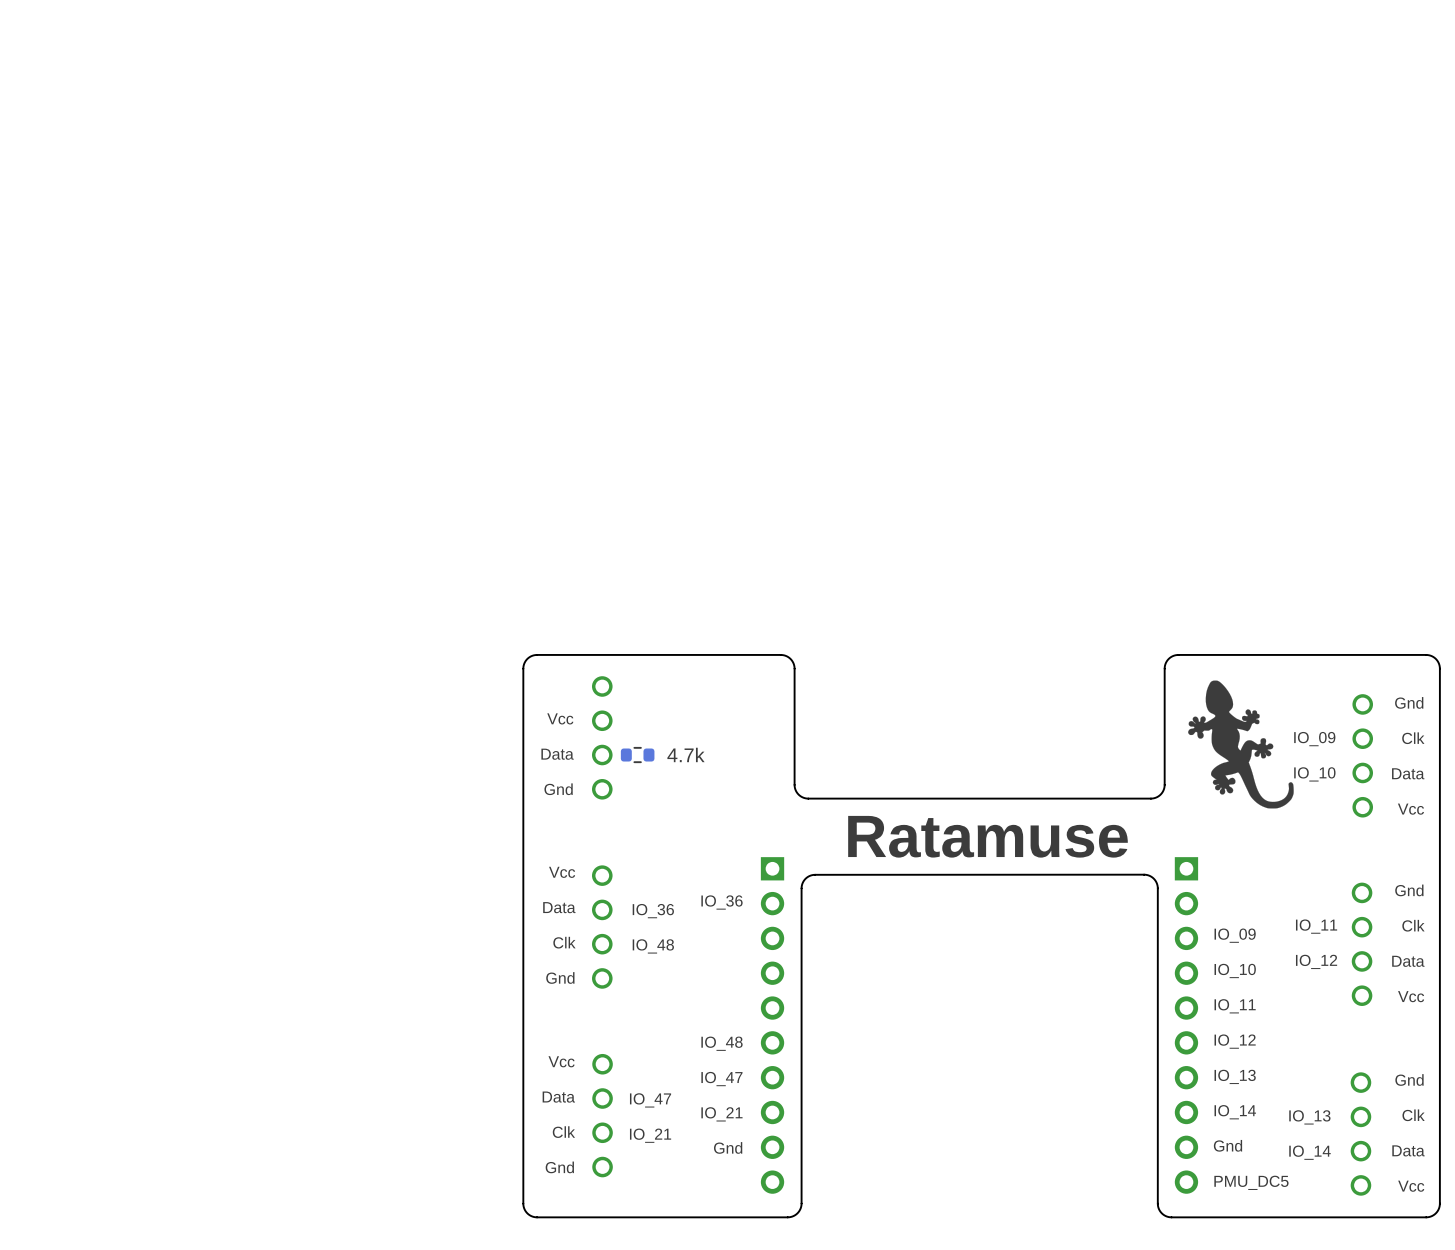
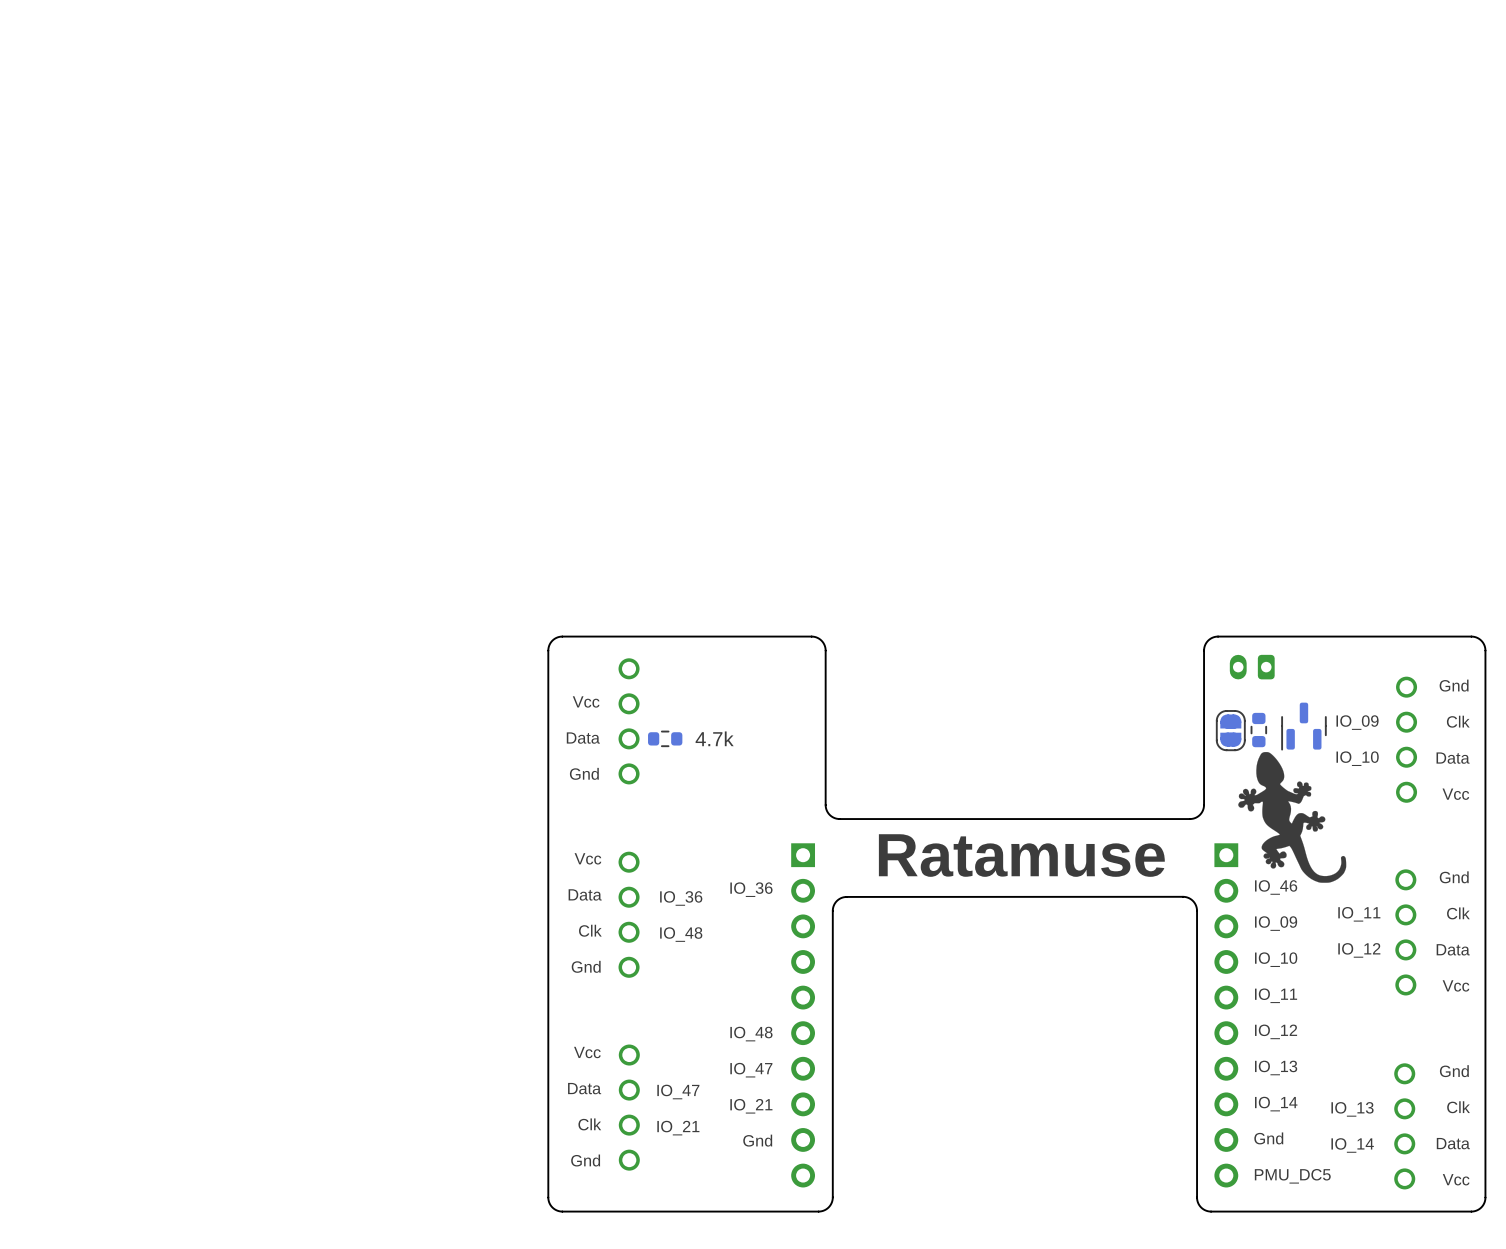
part: none -> (1252, 667)
part: none -> (1303, 726)
drawing position: (1240, 744) -> (1292, 817)
part: none -> (1230, 730)
part: none -> (1258, 730)
board edge: (1164, 784) (1160, 794) (1150, 798) (808, 798) (798, 794) (794, 784) -> (1204, 769) (1203, 808) (1198, 815) (1190, 819) (838, 818) (829, 814) (826, 808) (825, 769)
text position: Ratamuse (987, 836) -> Ratamuse (1021, 855)
text: none -> IO_46 (1276, 887)
board edge: (1157, 923) (1157, 885) (1152, 877) (1144, 874) (813, 874) (805, 878) (801, 885) (801, 923) -> (1197, 910) (1192, 900) (1183, 896) (846, 896) (836, 901) (832, 910)

